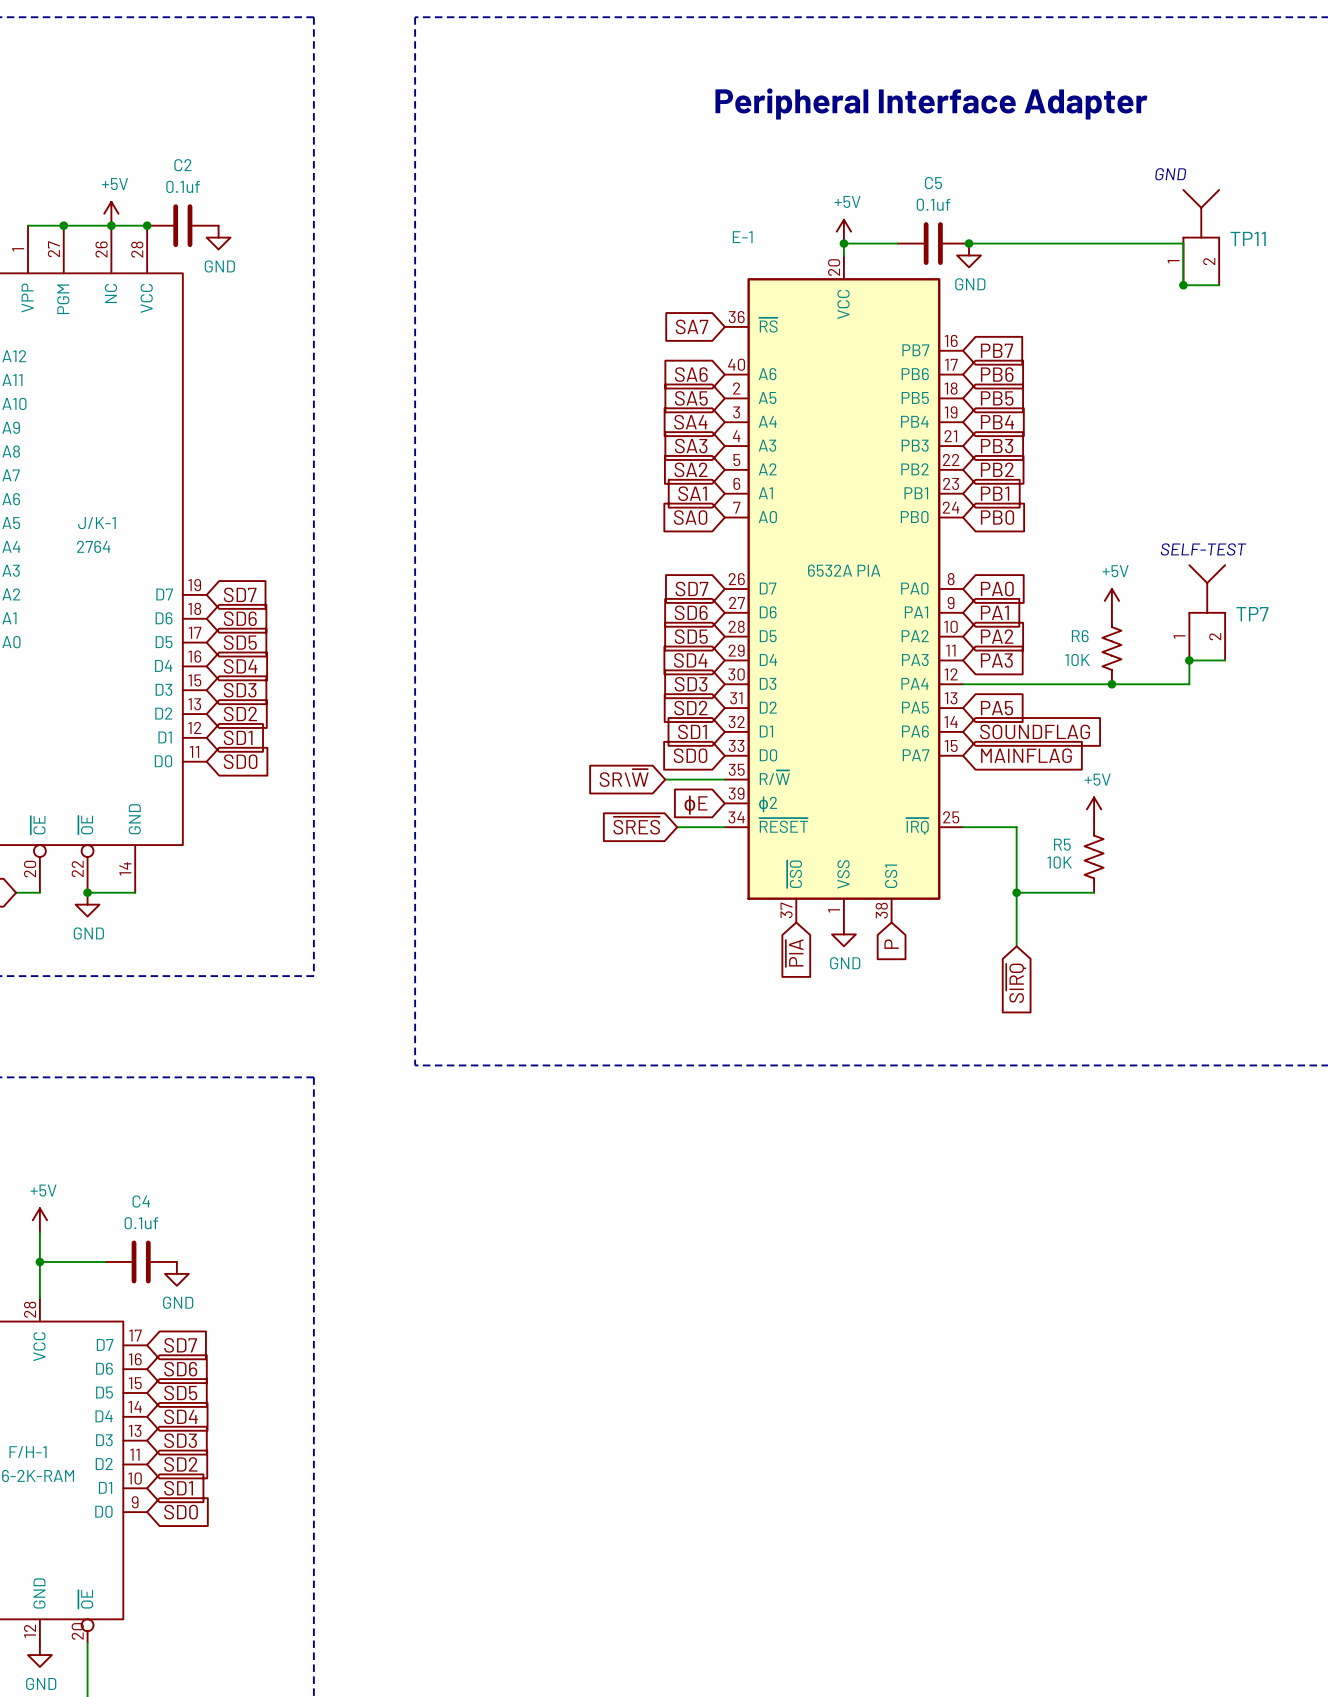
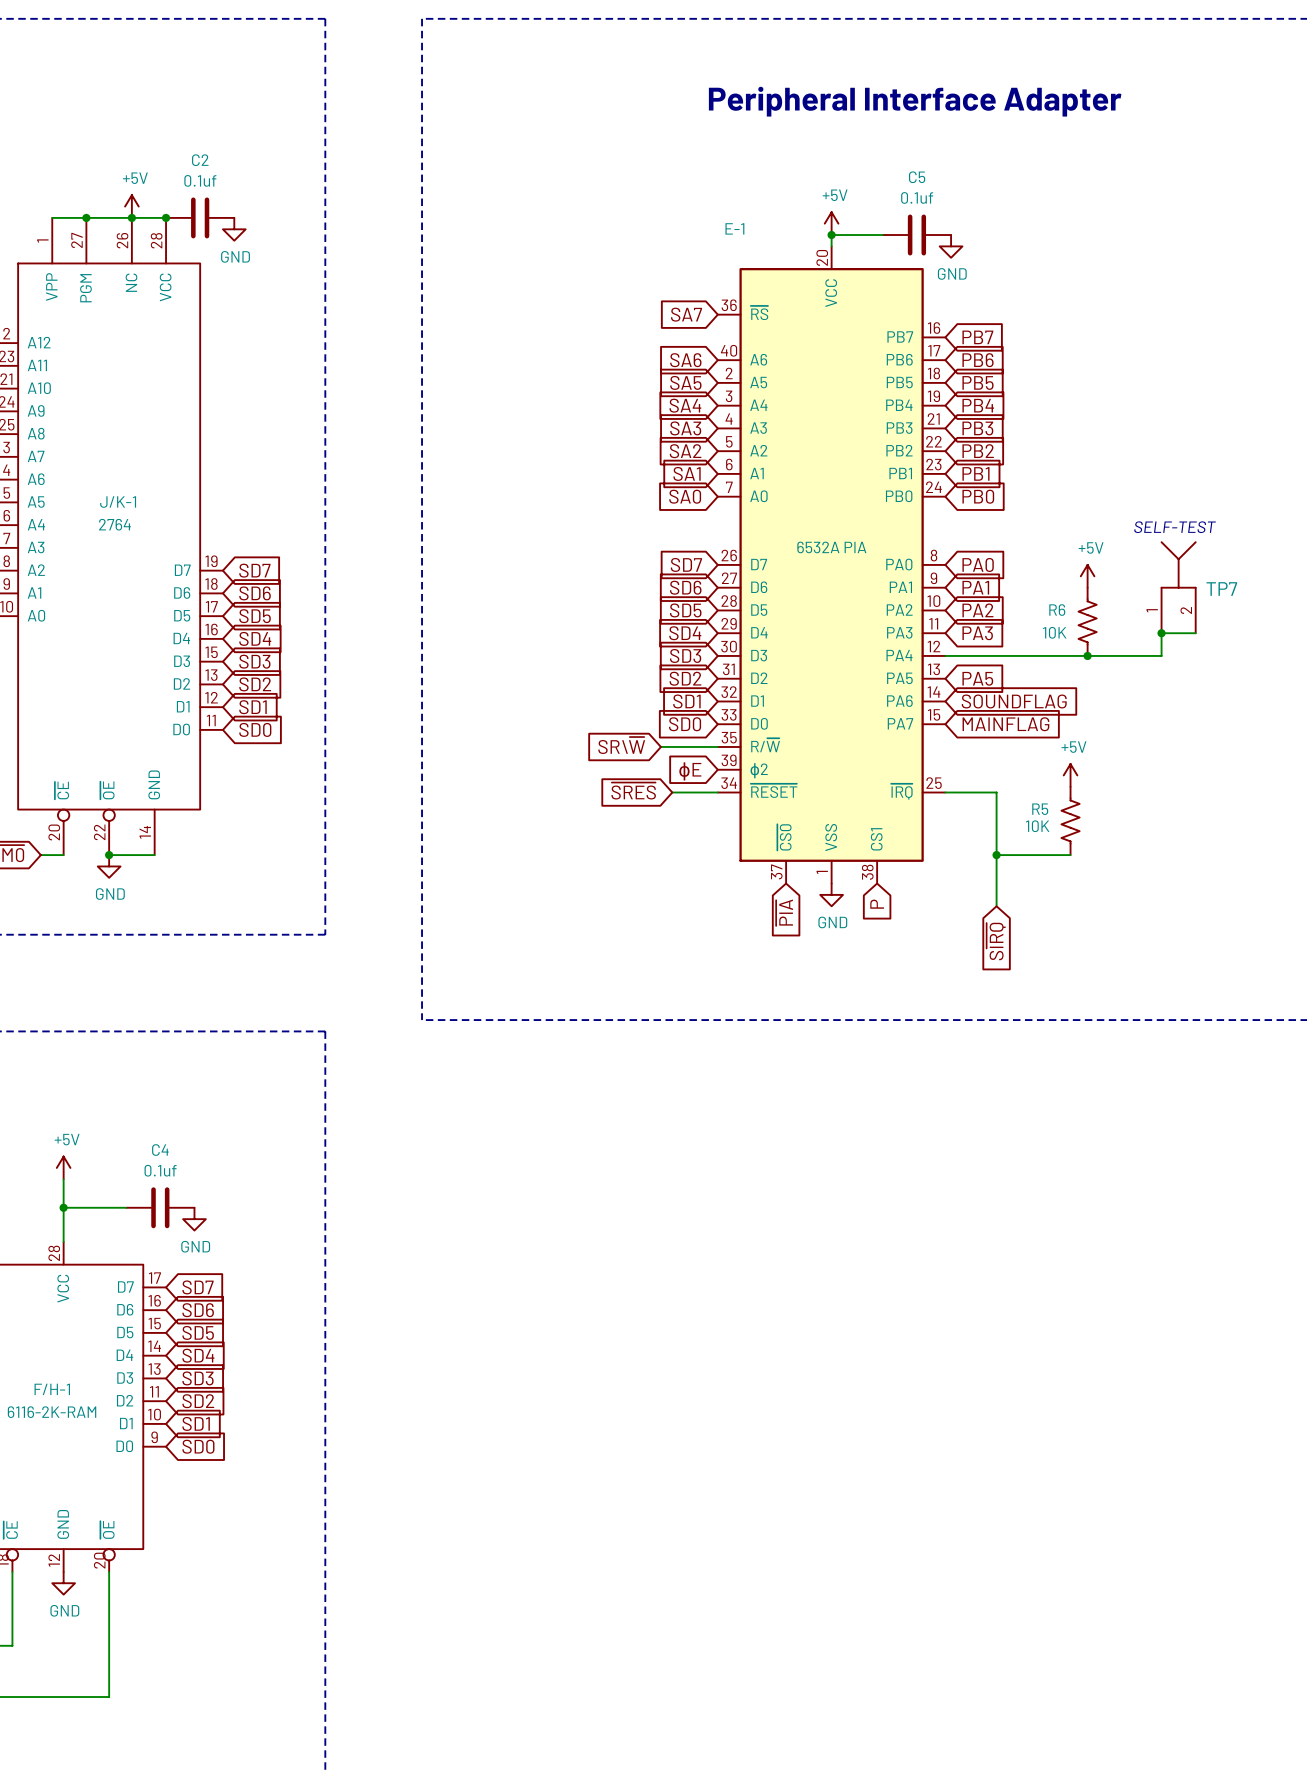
text: GND (1170, 174) -> none
TP11: (1201, 237) -> none
wire: (969, 243) (1183, 243) (1183, 285) (1219, 285) -> none
junction: (969, 243) -> none
junction: (1183, 285) -> none

